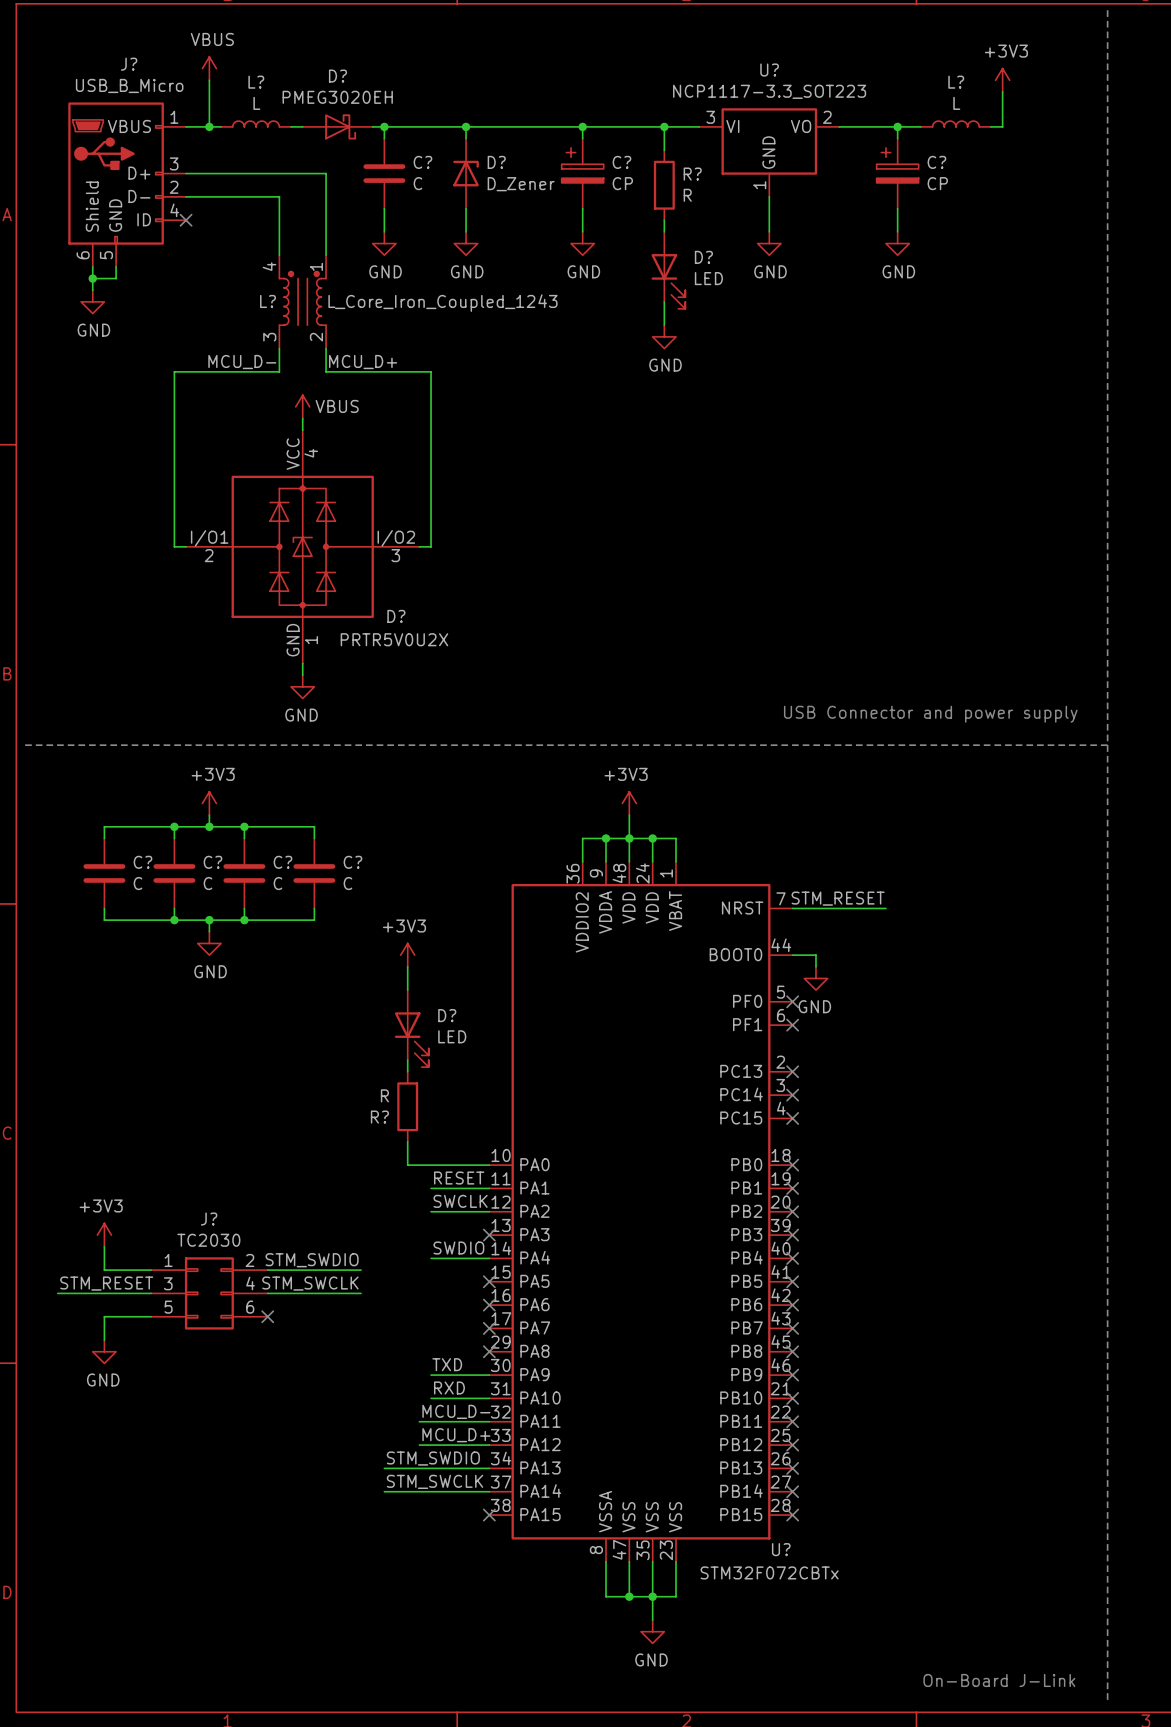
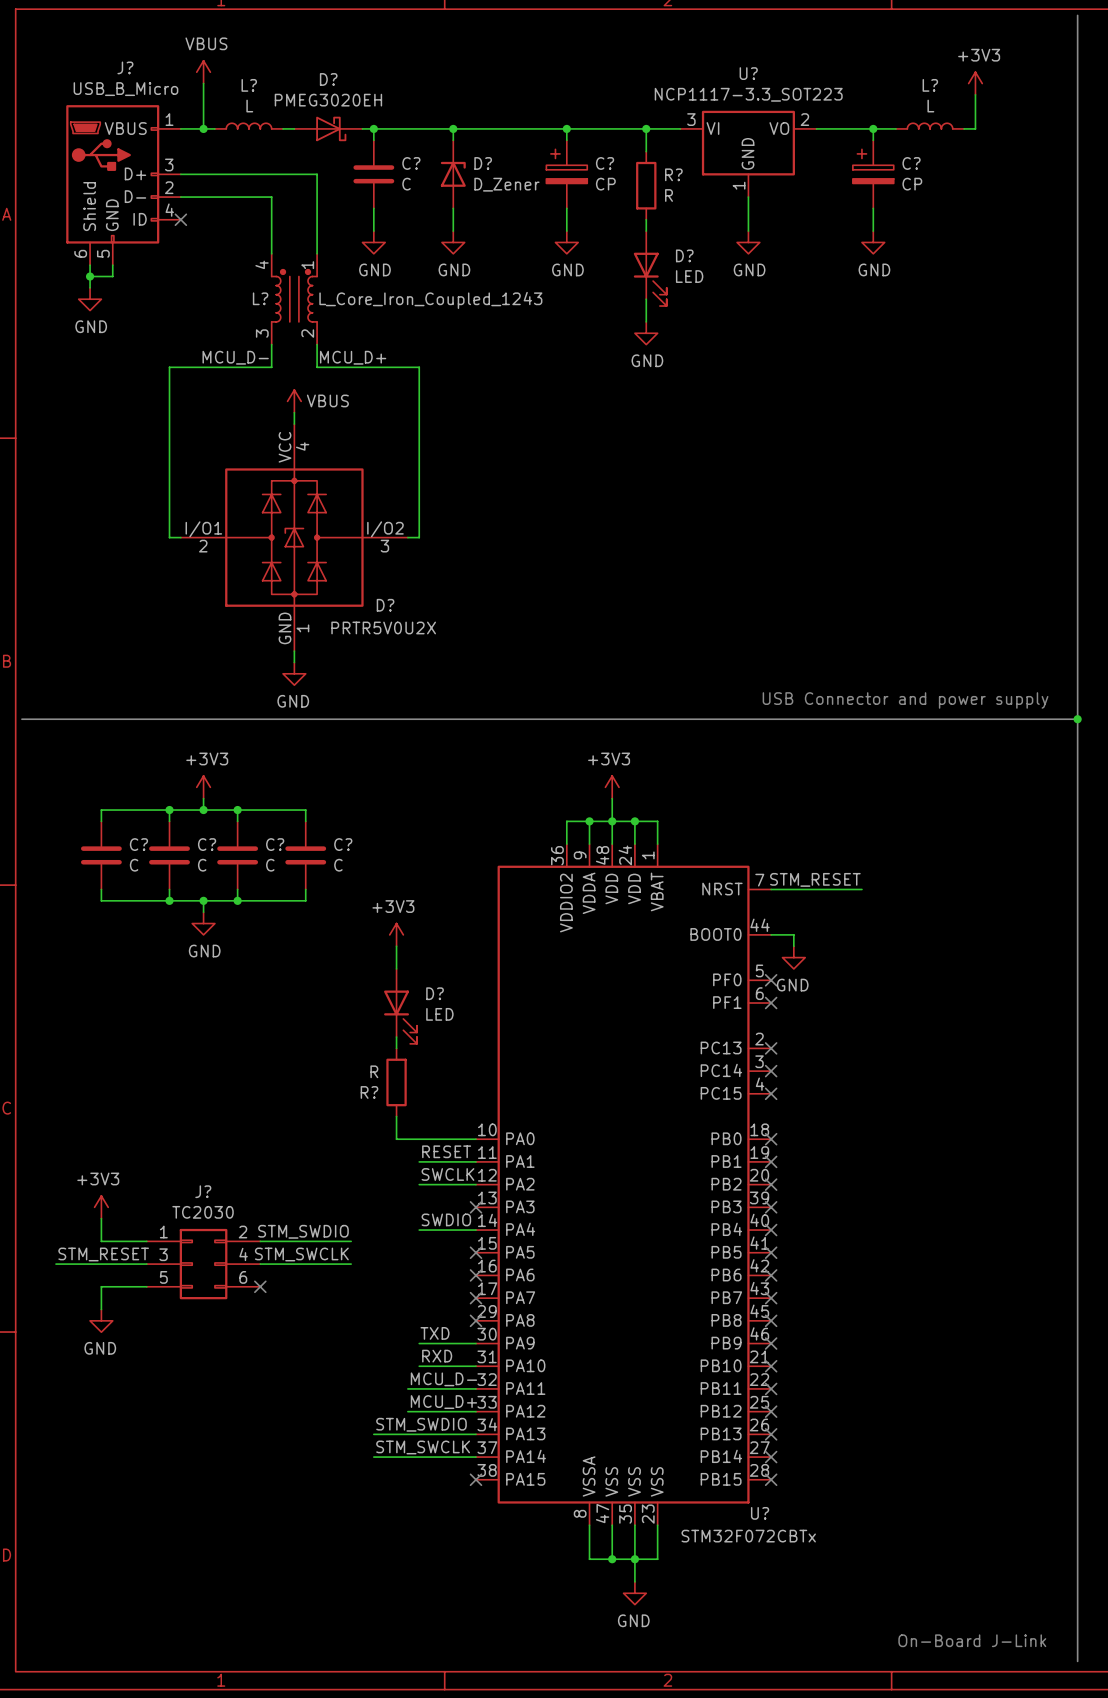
line: (1107, 10) (1107, 1701) -> none
bus: none -> (1077, 15) (1077, 1661)
bus: none -> (21, 719) (1077, 719)
junction: none -> (1077, 719)
line: (22, 745) (1107, 745) -> none

